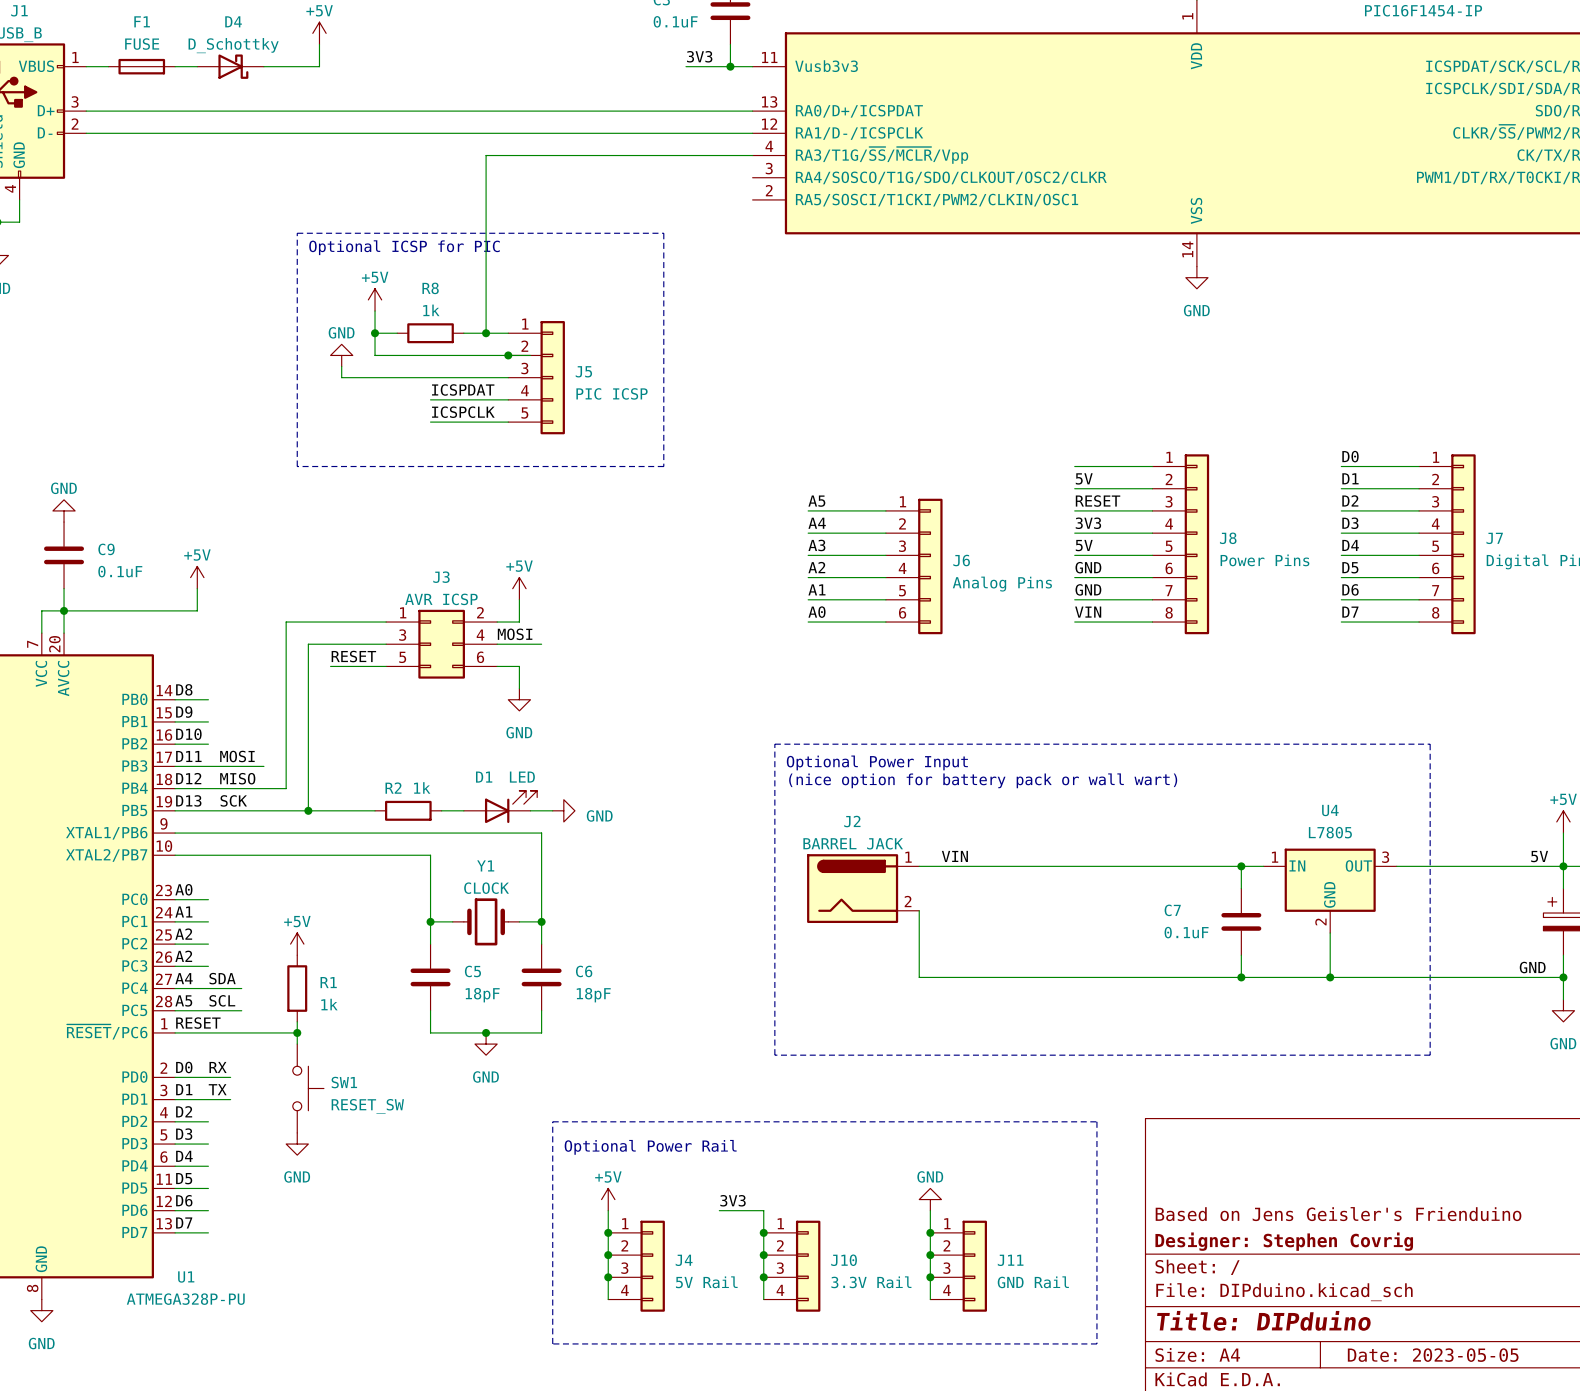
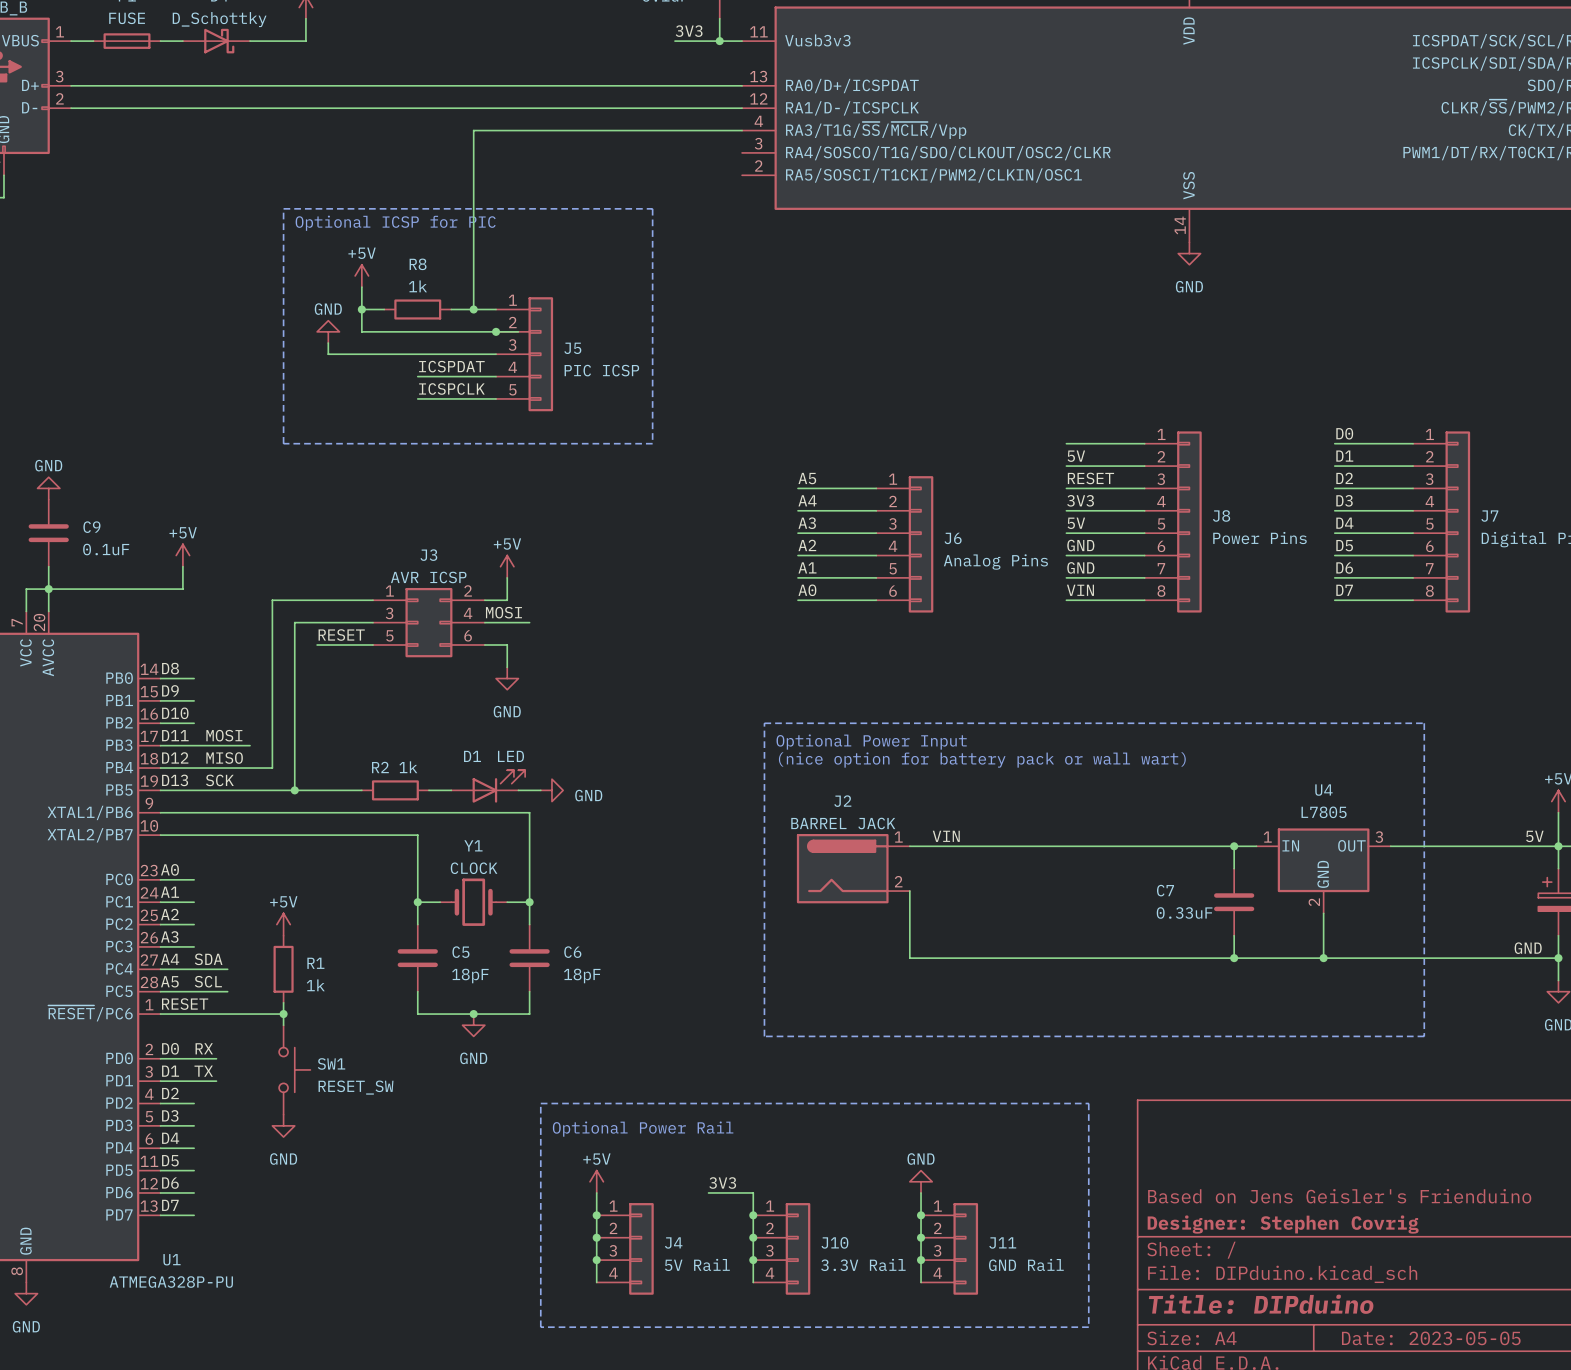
C7 value: 0.1uF (1186, 932) -> 0.33uF (1184, 912)
label: A2 (183, 956) -> A3 (169, 936)

